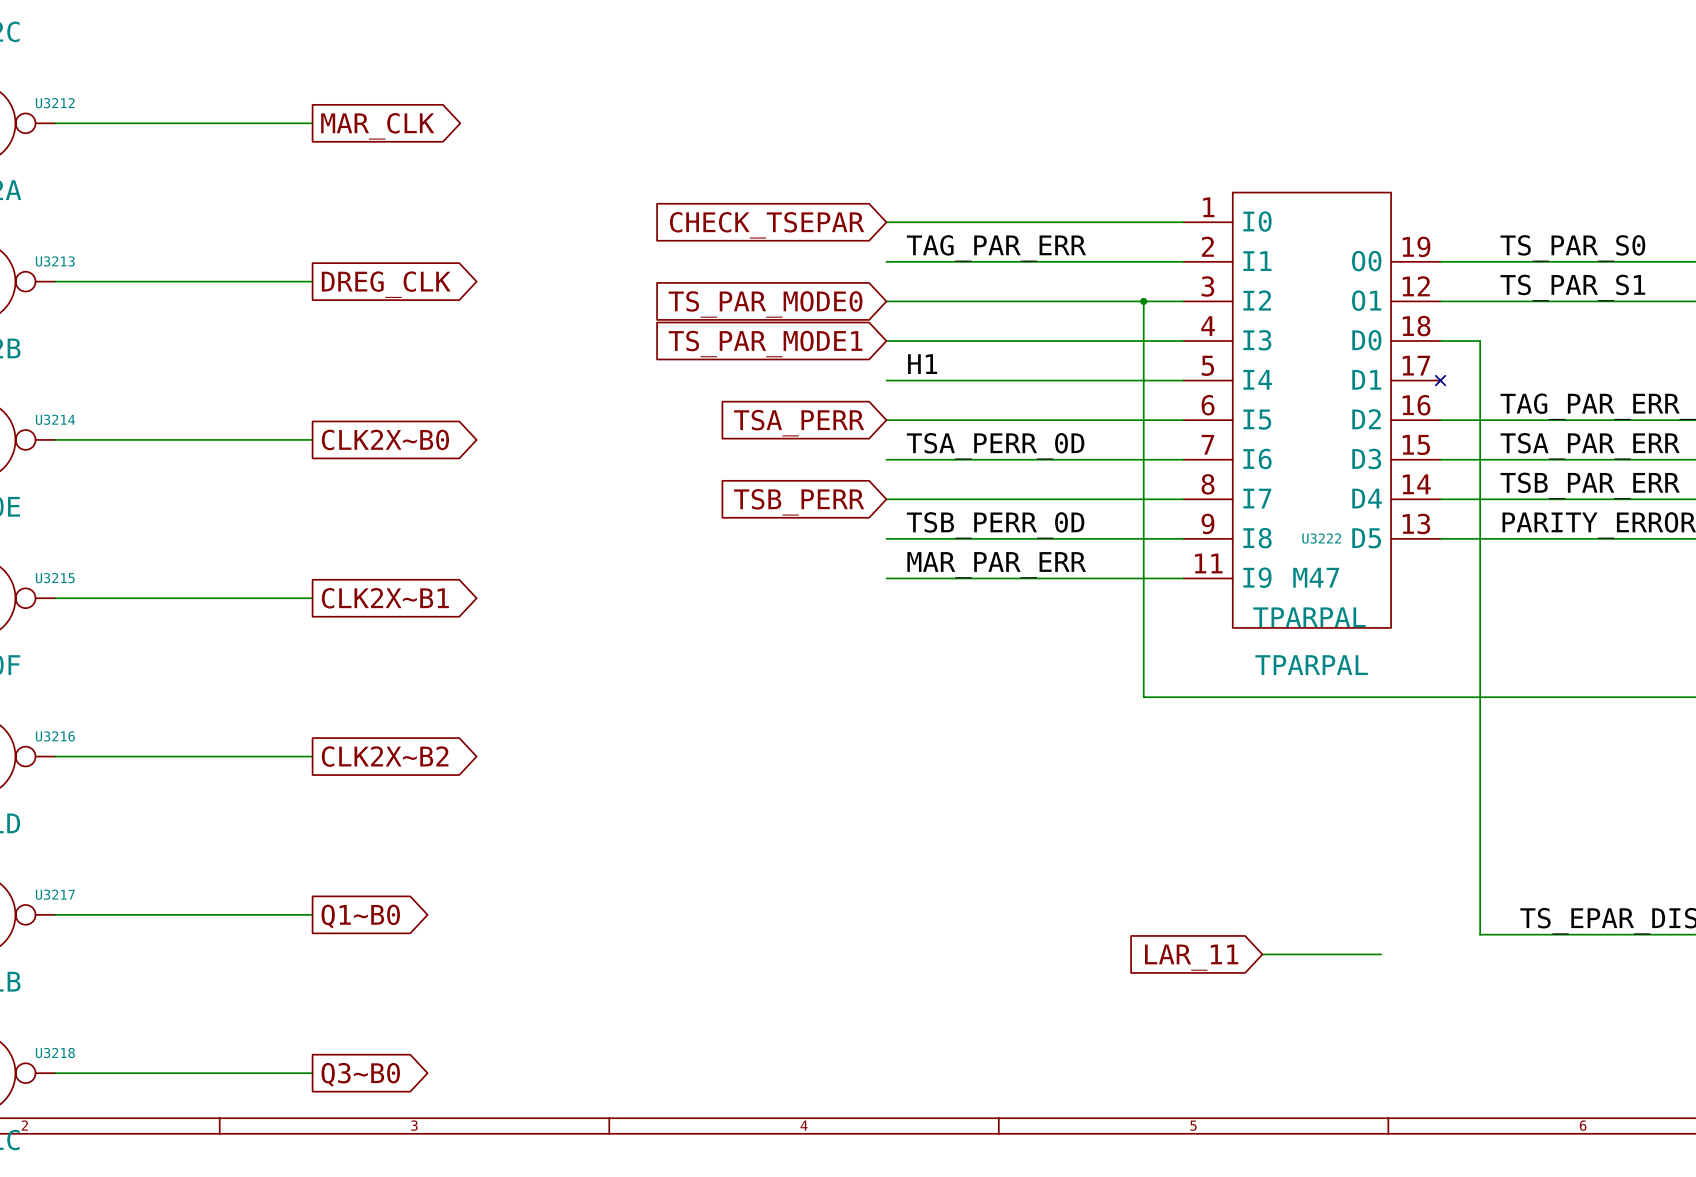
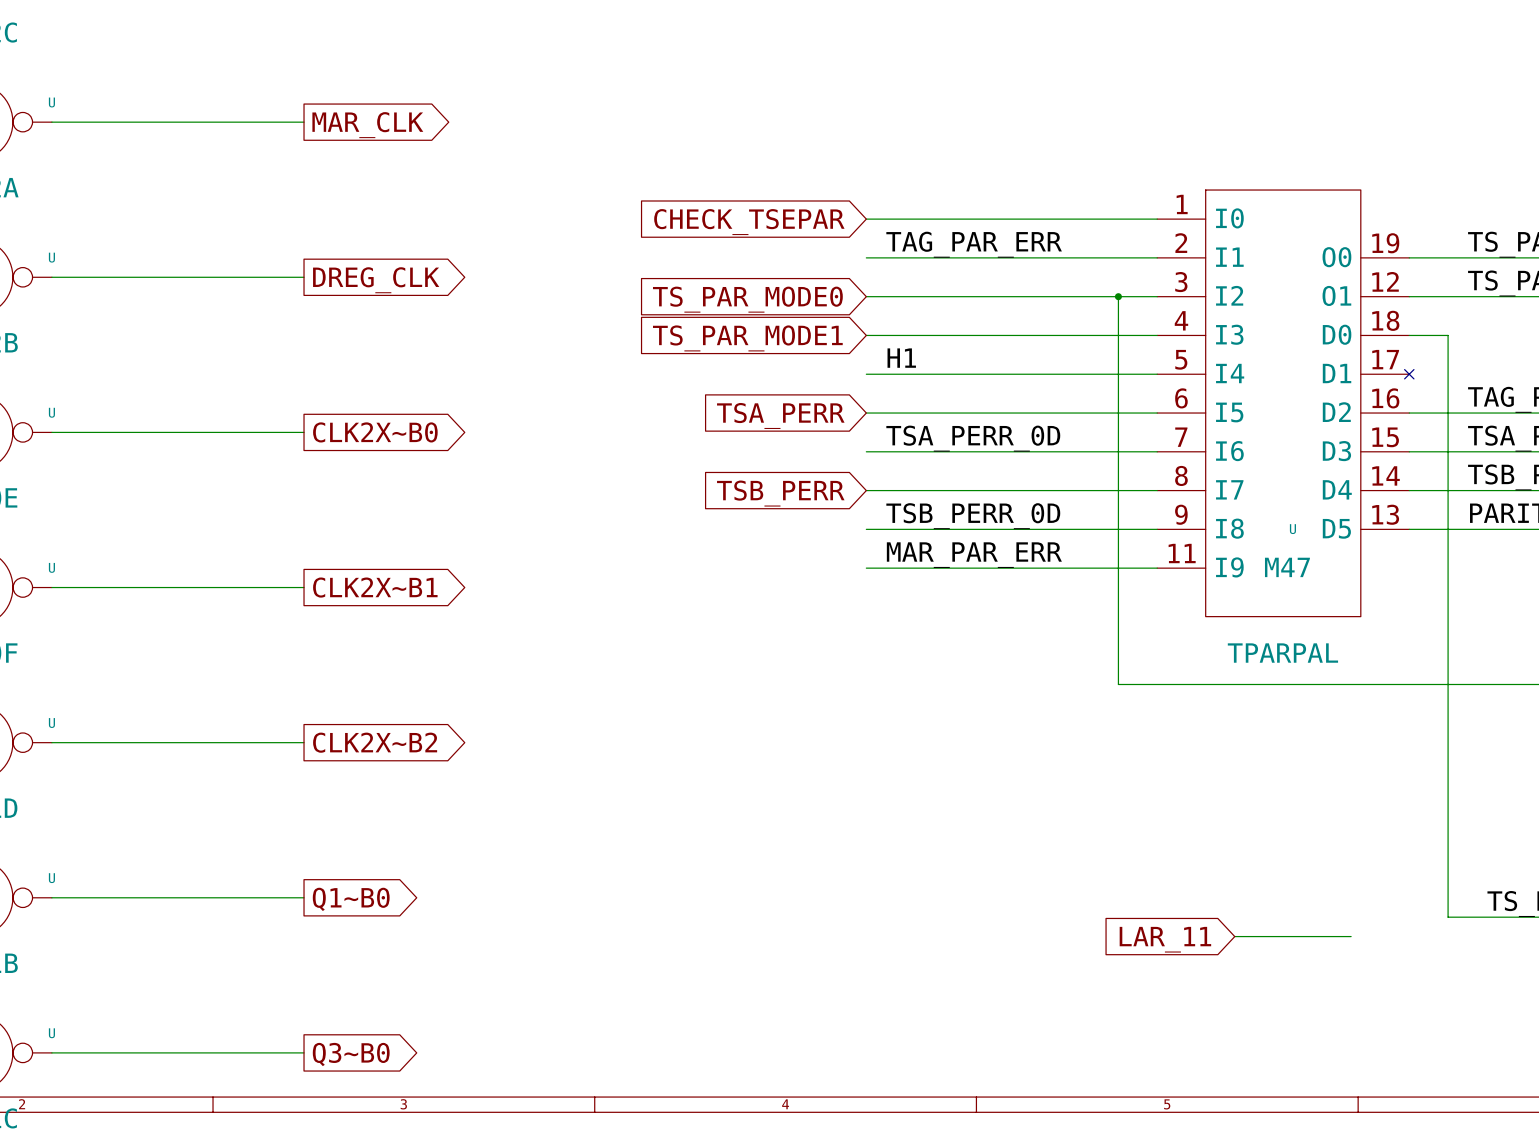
U3212 name: U3212 (55, 103) -> U (51, 102)
U3213 name: U3213 (55, 261) -> U (51, 257)
U3214 name: U3214 (55, 419) -> U (51, 412)
U3222 name: U3222 (1321, 538) -> U (1292, 529)
U3215 name: U3215 (55, 578) -> U (51, 567)
U3222 value: TPARPAL (1309, 617) -> none
U3216 name: U3216 (55, 736) -> U (51, 723)
U3217 name: U3217 (55, 894) -> U (51, 878)
U3218 name: U3218 (55, 1053) -> U (51, 1033)

